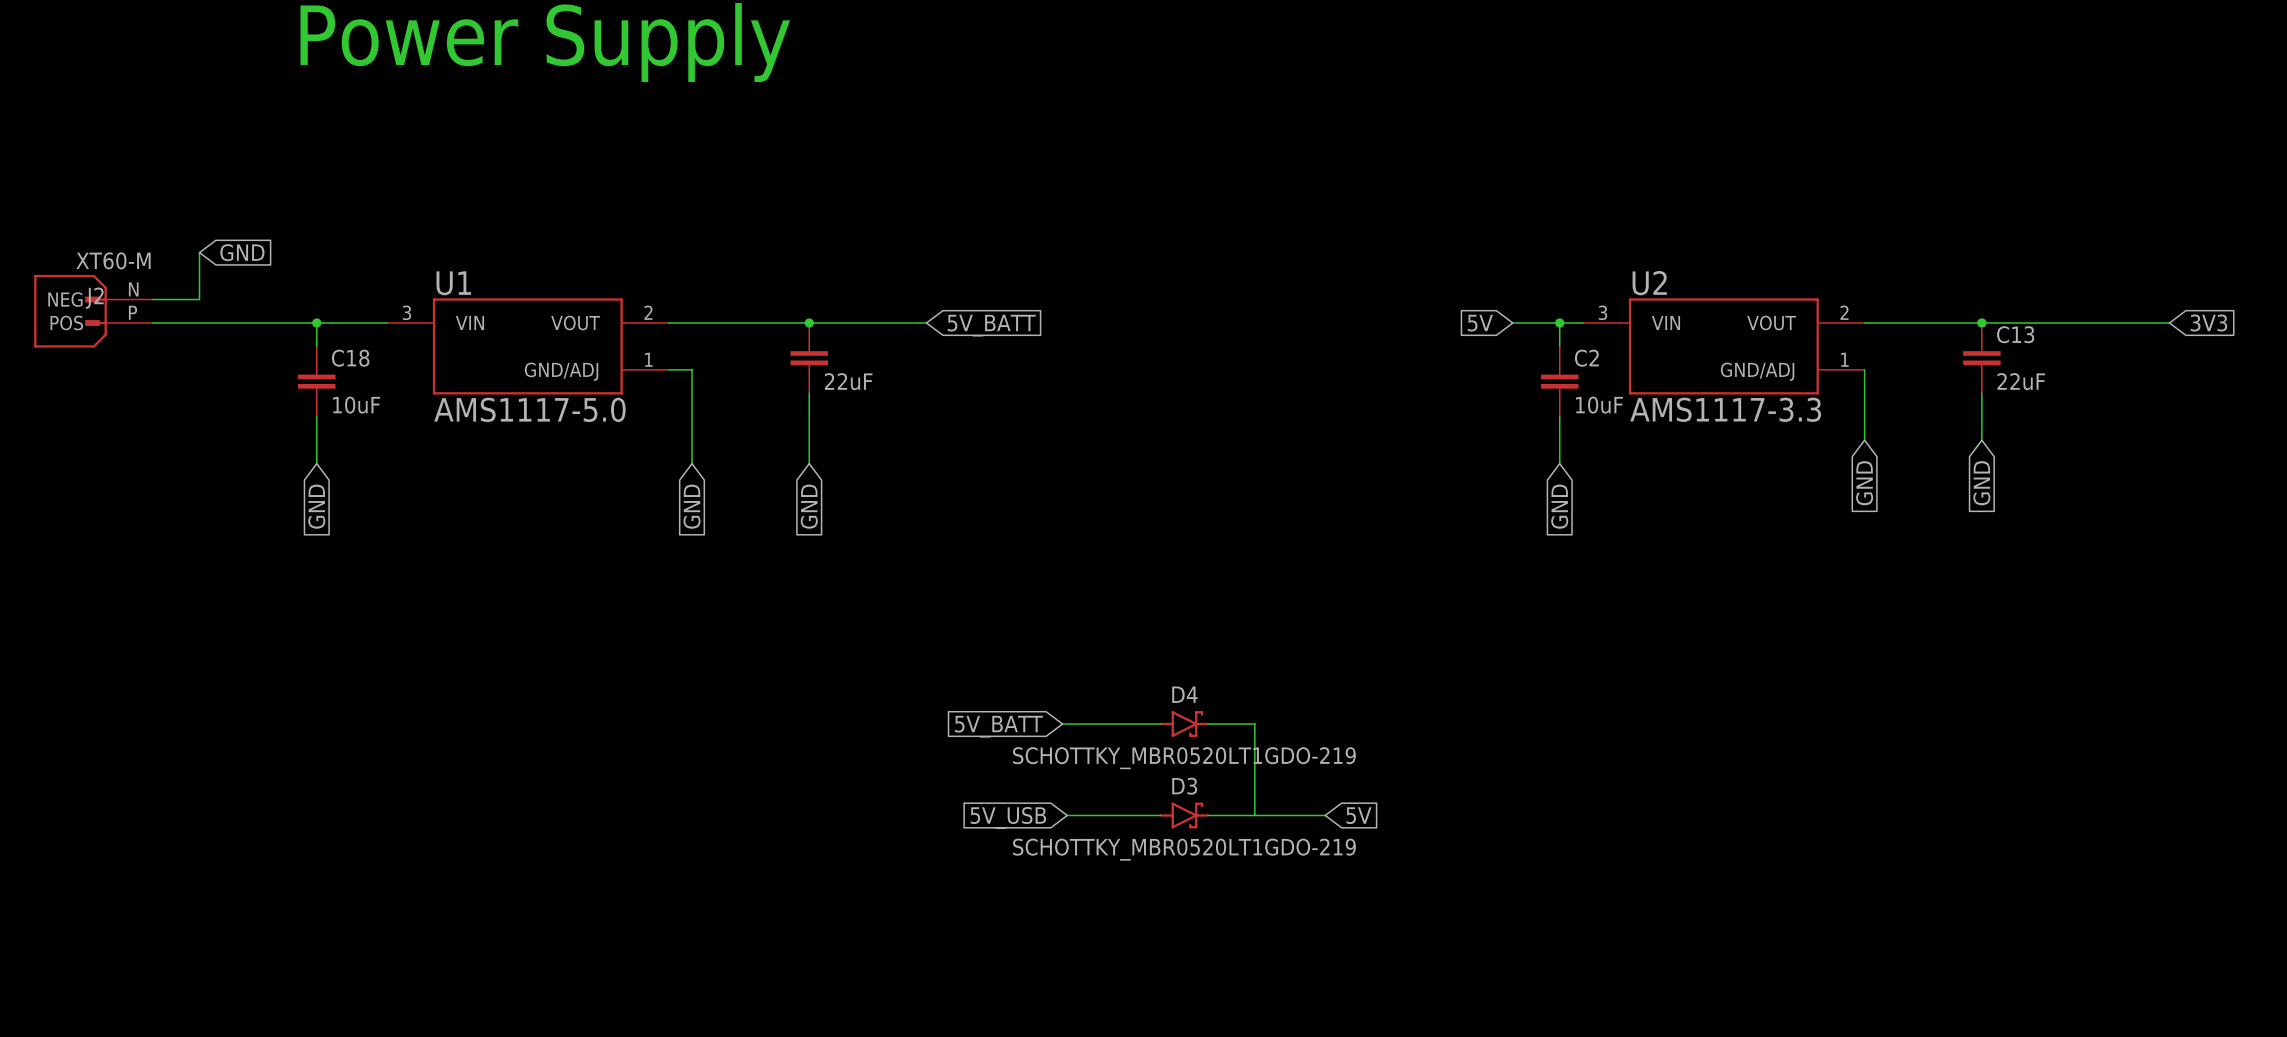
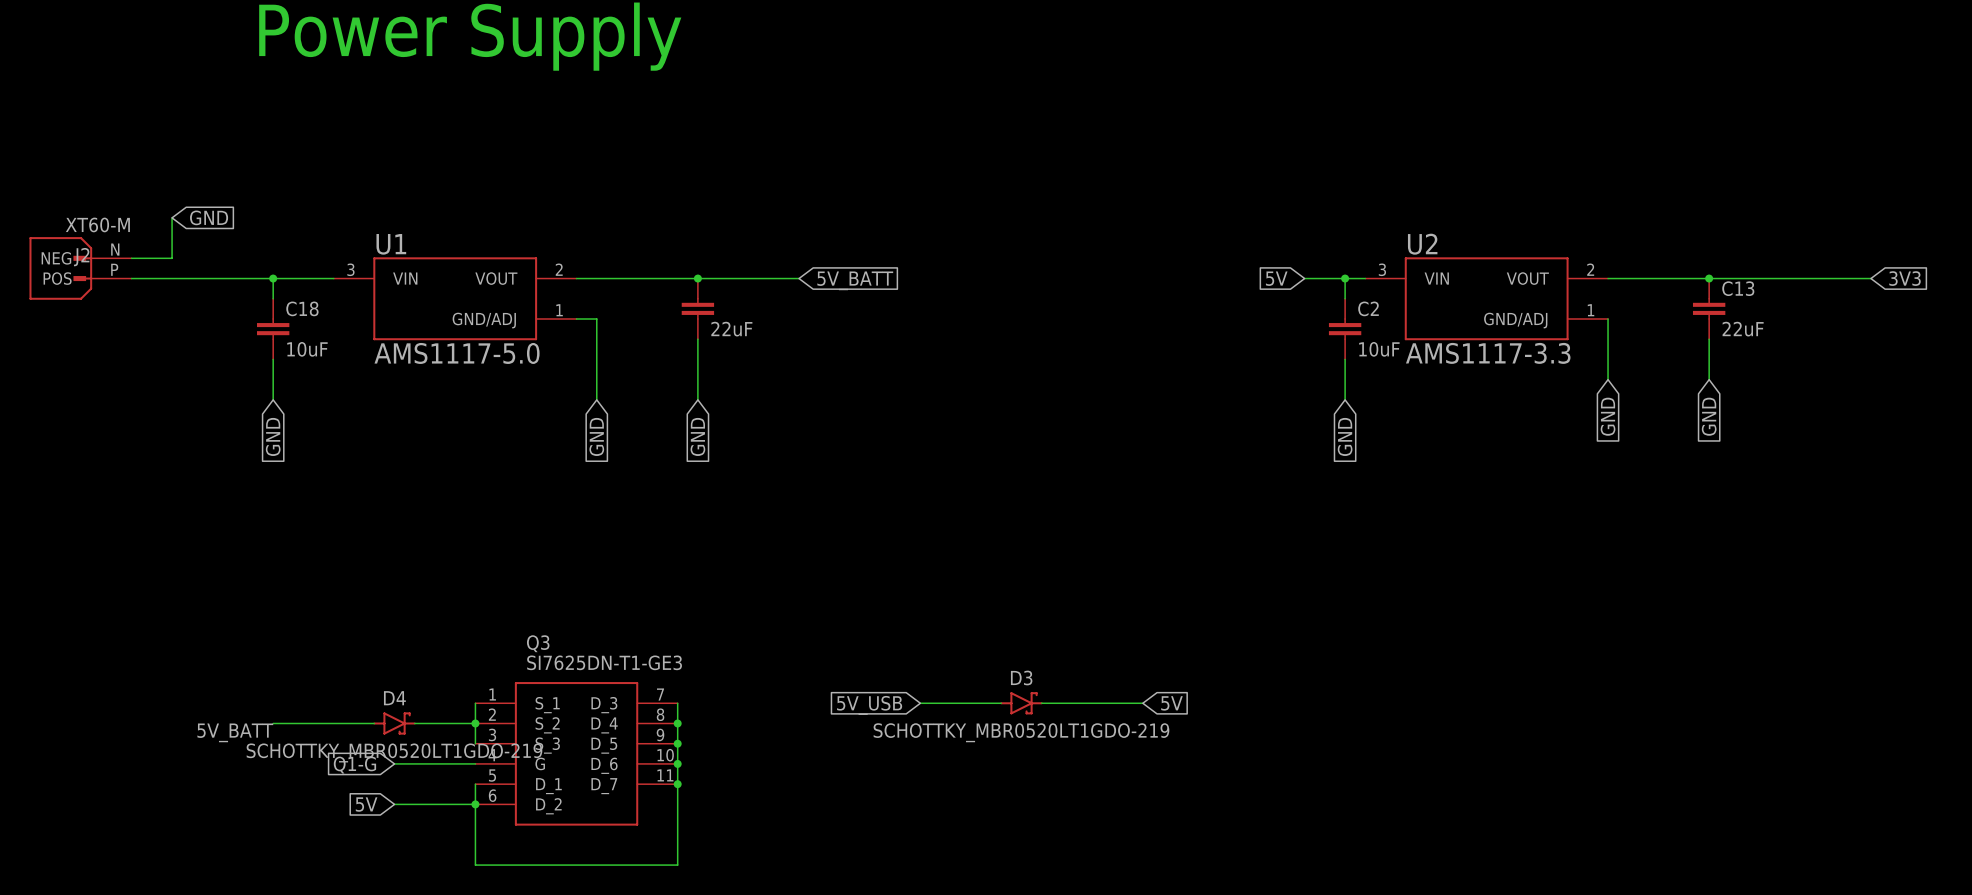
wire: (1062, 724) (1161, 724) -> none
D4 position: (1184, 724) -> (394, 723)
wire: (1207, 724) (1254, 724) (1254, 815) -> none
global label: 5V_BATT (998, 726) -> none
wire: none -> (475, 703) (475, 743)
wire: none -> (677, 703) (677, 865) (475, 865) (475, 784)
wire: none -> (273, 723) (374, 723)
wire: none -> (414, 723) (475, 723)
junction: none -> (475, 723)
junction: none -> (677, 723)
label: none -> 5V_BATT (235, 732)
junction: none -> (677, 743)
Q3: none -> SI7625DN-T1-GE3 (576, 753)
wire: none -> (394, 763) (475, 763)
junction: none -> (677, 763)
global label: none -> Q1-G (354, 765)
junction: none -> (677, 784)
global label: none -> 5V (366, 804)
wire: none -> (394, 804) (475, 804)
junction: none -> (475, 804)

